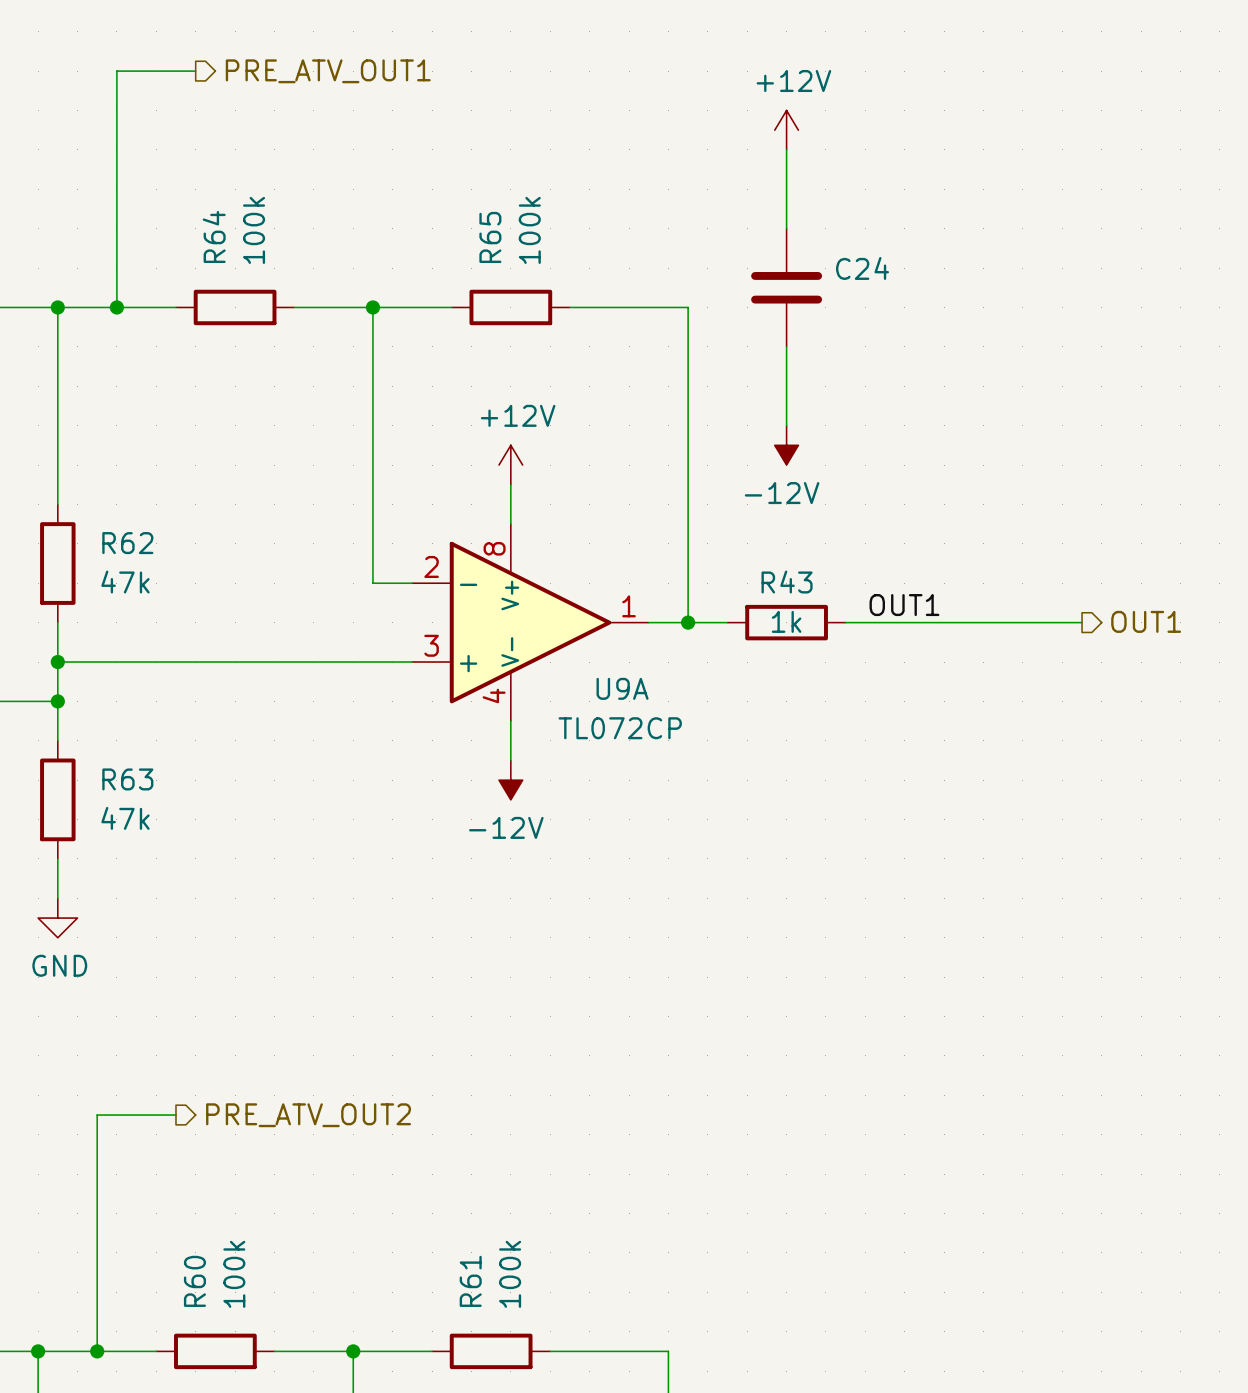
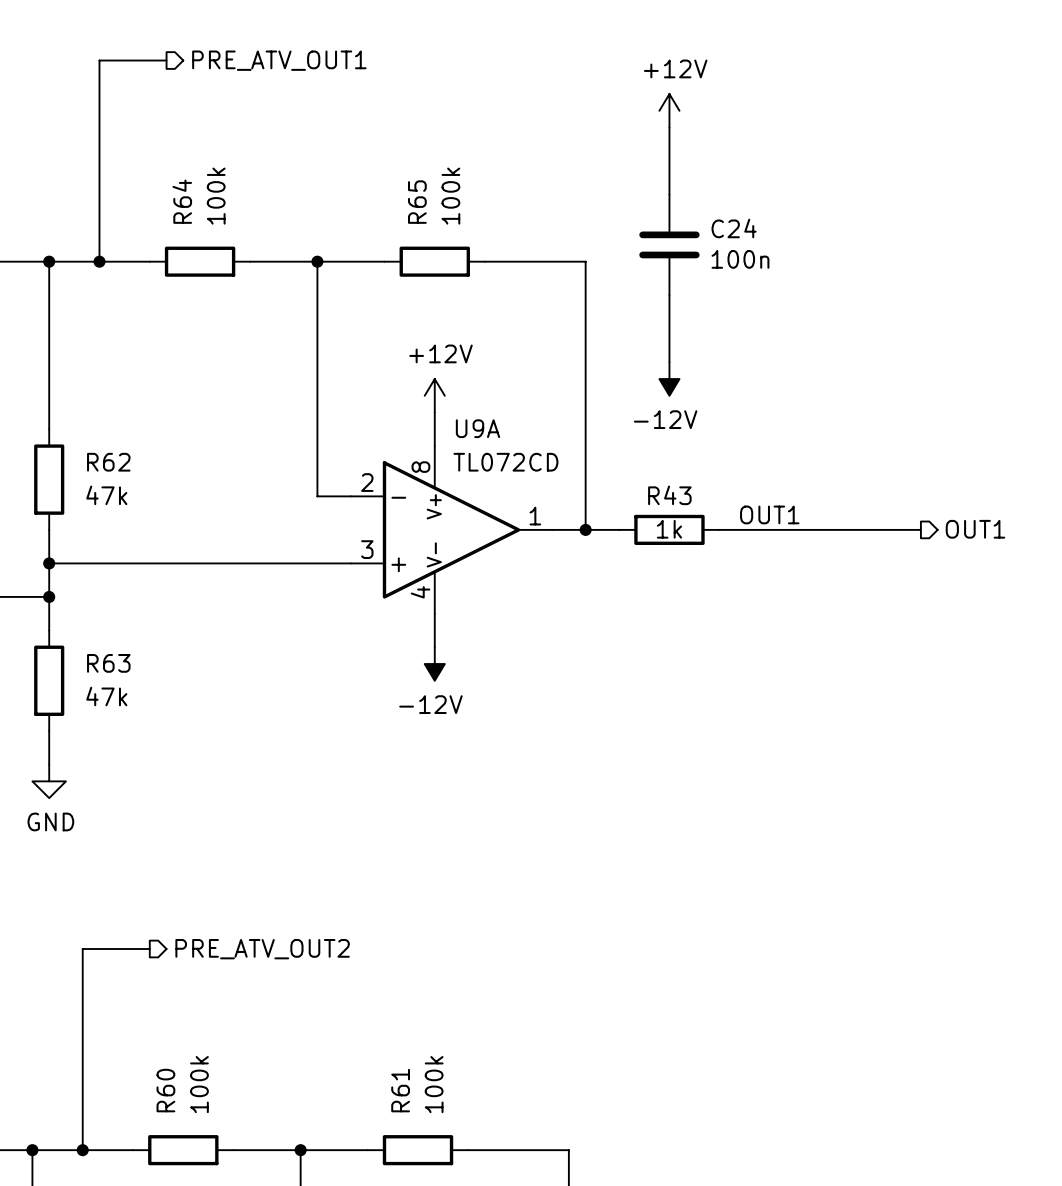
C24 value: none -> 100n (740, 259)
U9A name position: U9A (622, 688) -> U9A (478, 428)
U9A value: TL072CP (620, 728) -> TL072CD (505, 462)

